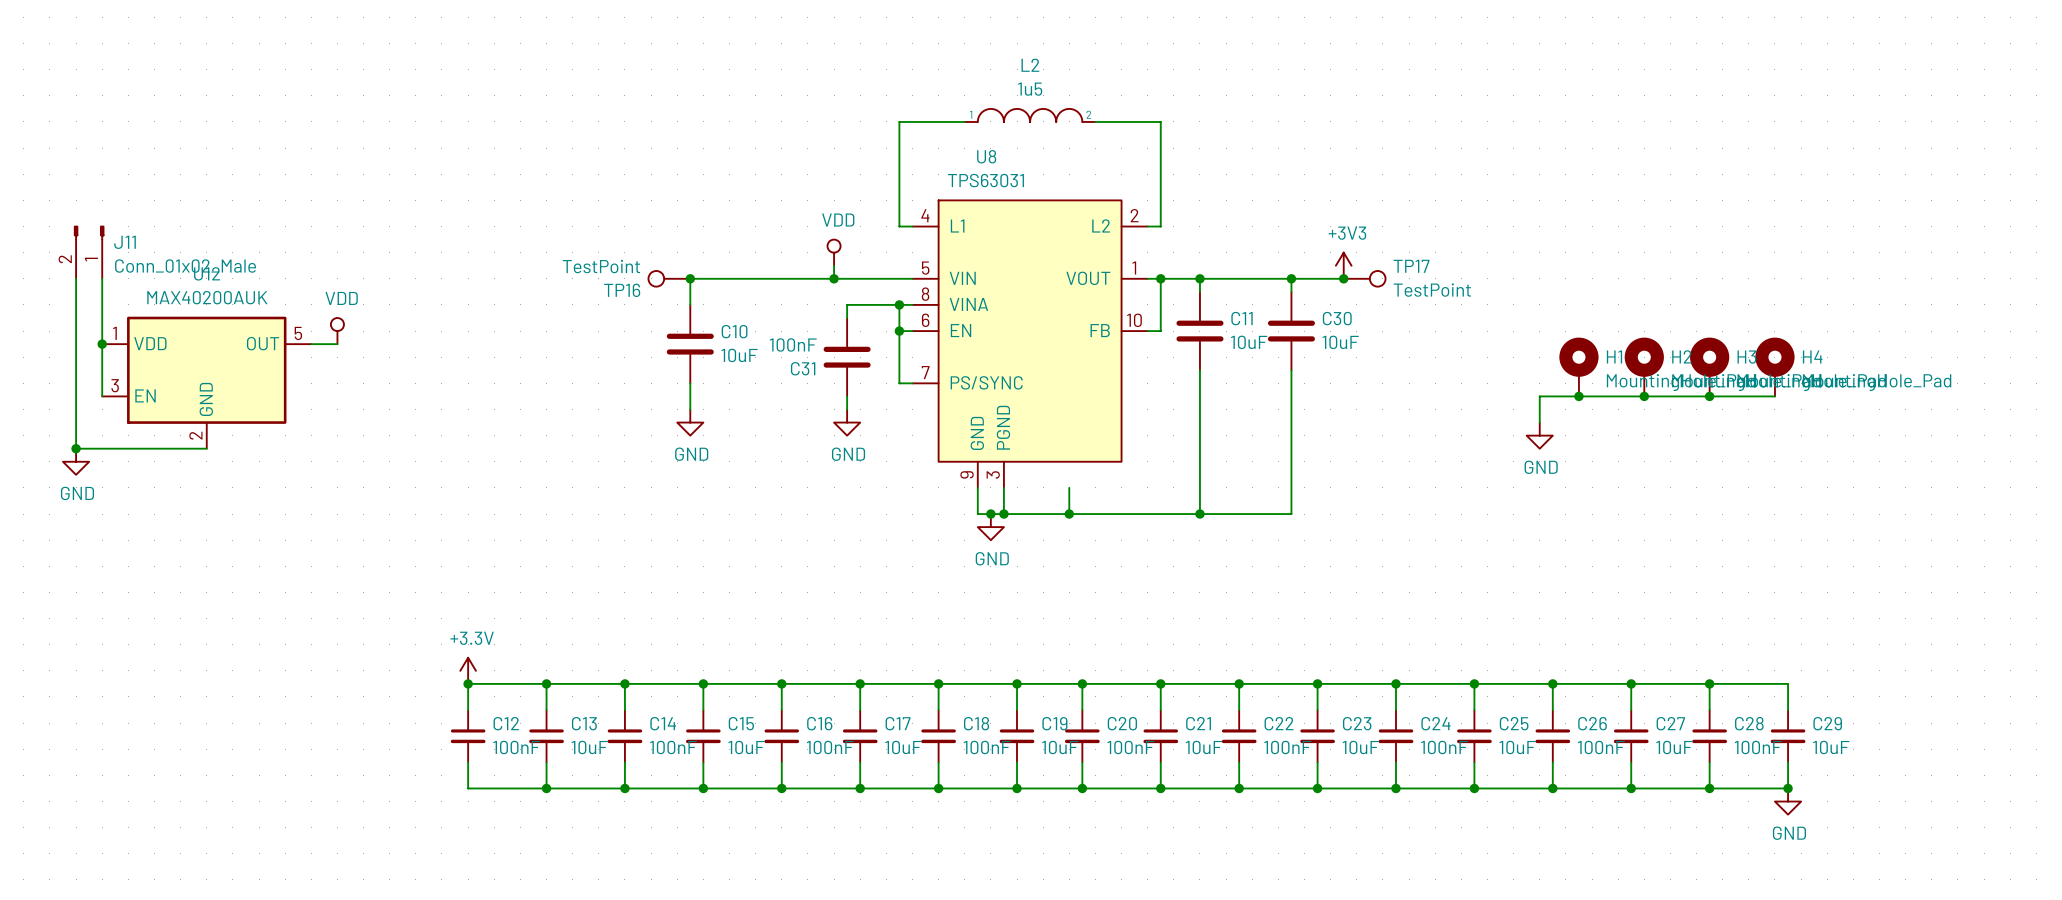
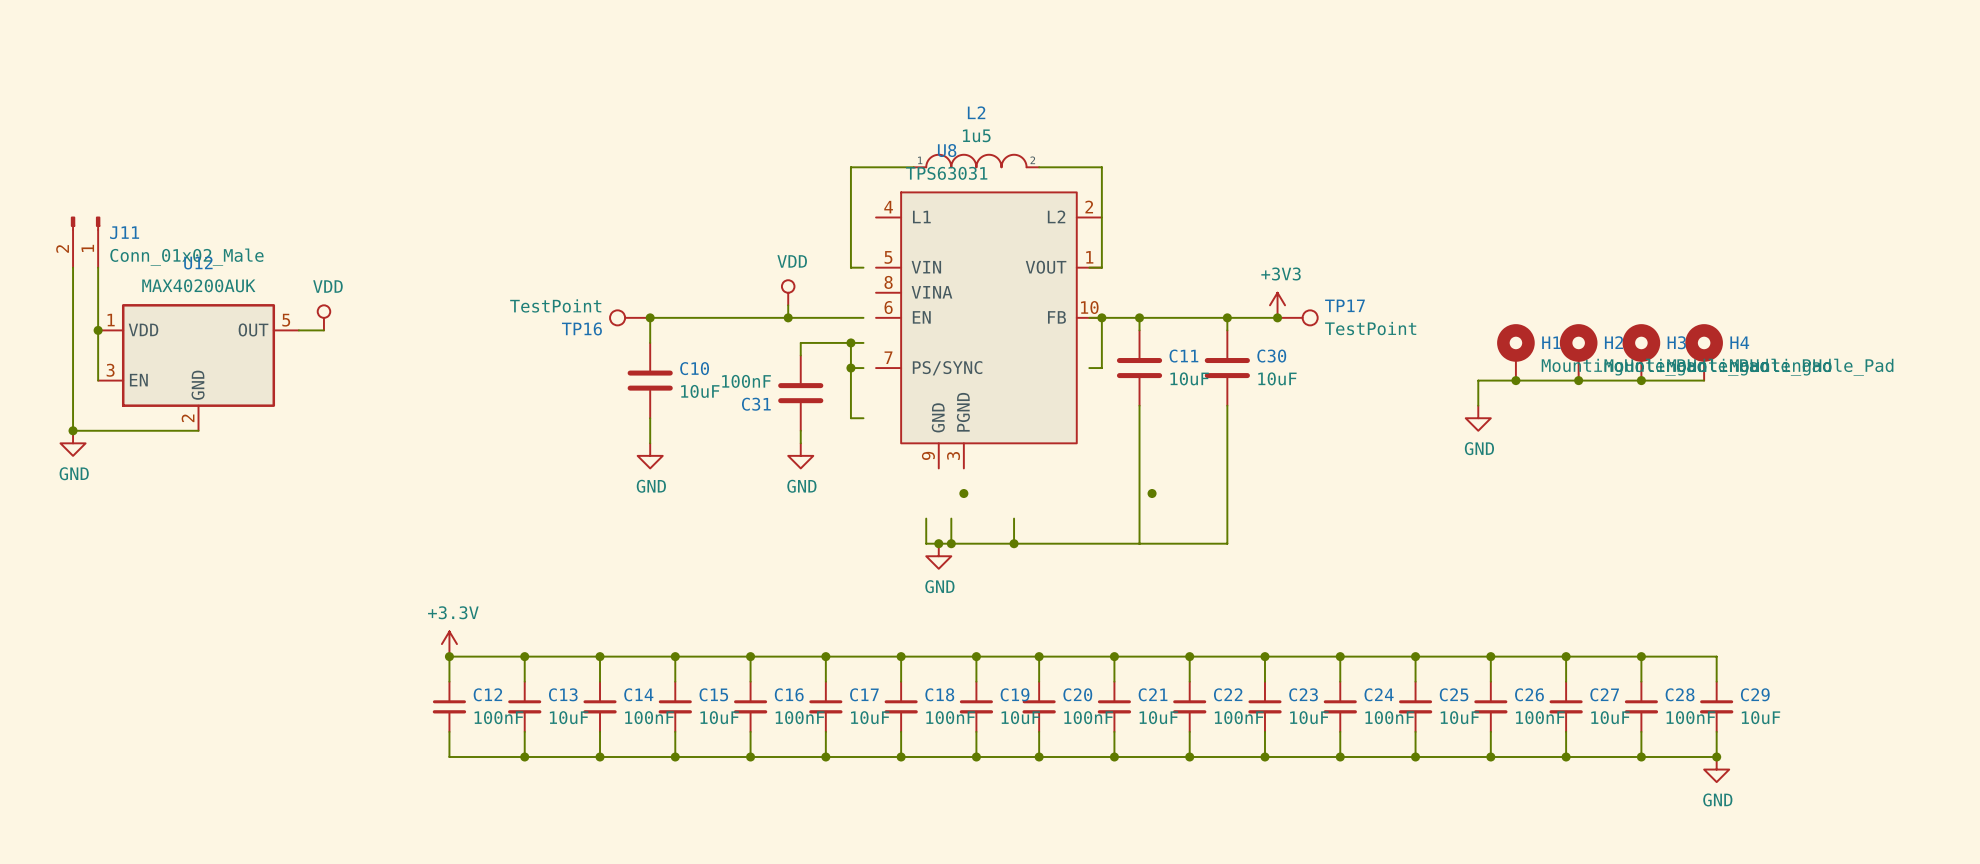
L2 position: (1030, 115) -> (976, 161)
wire: (964, 121) (899, 121) (899, 226) (912, 226) -> none
wire: (1095, 121) (1160, 121) (1160, 226) (1147, 226) -> (1039, 167) (1101, 167) (1101, 267) (1089, 267)
power symbol position: VDD (834, 252) -> VDD (788, 292)
power symbol position: +3V3 (1343, 265) -> +3V3 (1277, 305)
TP16 position: (669, 278) -> (630, 317)
junction position: (690, 278) -> (650, 317)
junction: (834, 278) -> none
wire: (886, 278) (690, 278) (690, 304) -> (850, 267) (850, 167) (913, 167)
wire: (899, 278) (912, 278) -> (850, 368) (863, 368)
wire: (1147, 278) (1343, 278) -> none
wire: (1160, 278) (1160, 331) -> (1277, 317) (1114, 317)
junction: (1160, 278) -> none
wire: (1199, 278) (1199, 291) -> (1139, 317) (1139, 330)
junction: (1199, 278) -> none
wire: (1291, 278) (1291, 291) -> (1227, 317) (1227, 330)
junction: (1291, 278) -> none
junction: (1343, 278) -> none
TP17 position: (1364, 278) -> (1297, 317)
wire: (899, 304) (899, 383) (912, 383) -> (850, 342) (850, 418) (863, 418)
junction: (899, 304) -> none
wire: (912, 304) (847, 304) (847, 318) -> (863, 342) (800, 342) (800, 355)
junction: none -> (788, 317)
wire: (899, 331) (912, 331) -> (863, 317) (650, 317) (650, 342)
junction: (899, 331) -> none
wire: none -> (1089, 317) (1101, 317) (1101, 368) (1089, 368)
junction: none -> (1101, 317)
junction: none -> (1139, 317)
C11 position: (1199, 331) -> (1139, 368)
junction: none -> (1227, 317)
C30 position: (1291, 331) -> (1227, 368)
junction: none -> (1277, 317)
C10 position: (690, 344) -> (650, 380)
C31 position: (847, 357) -> (800, 393)
junction: none -> (850, 342)
wire: (1199, 370) (1199, 514) -> (1139, 405) (1139, 543)
wire: (1291, 370) (1291, 514) (977, 514) (977, 487) -> (1227, 405) (1227, 543) (926, 543) (926, 518)
wire: (690, 383) (690, 409) -> (650, 418) (650, 443)
junction: none -> (850, 368)
power symbol position: GND (690, 422) -> GND (650, 455)
power symbol position: GND (847, 422) -> GND (800, 455)
wire: (1003, 487) (1003, 514) -> (951, 518) (951, 543)
wire: (1069, 487) (1069, 514) -> (1014, 518) (1014, 543)
junction: (990, 514) -> none
junction: (1069, 514) -> none
power symbol position: GND (990, 527) -> GND (938, 556)
junction: none -> (938, 543)
junction: none -> (951, 543)
junction: none -> (1014, 543)

